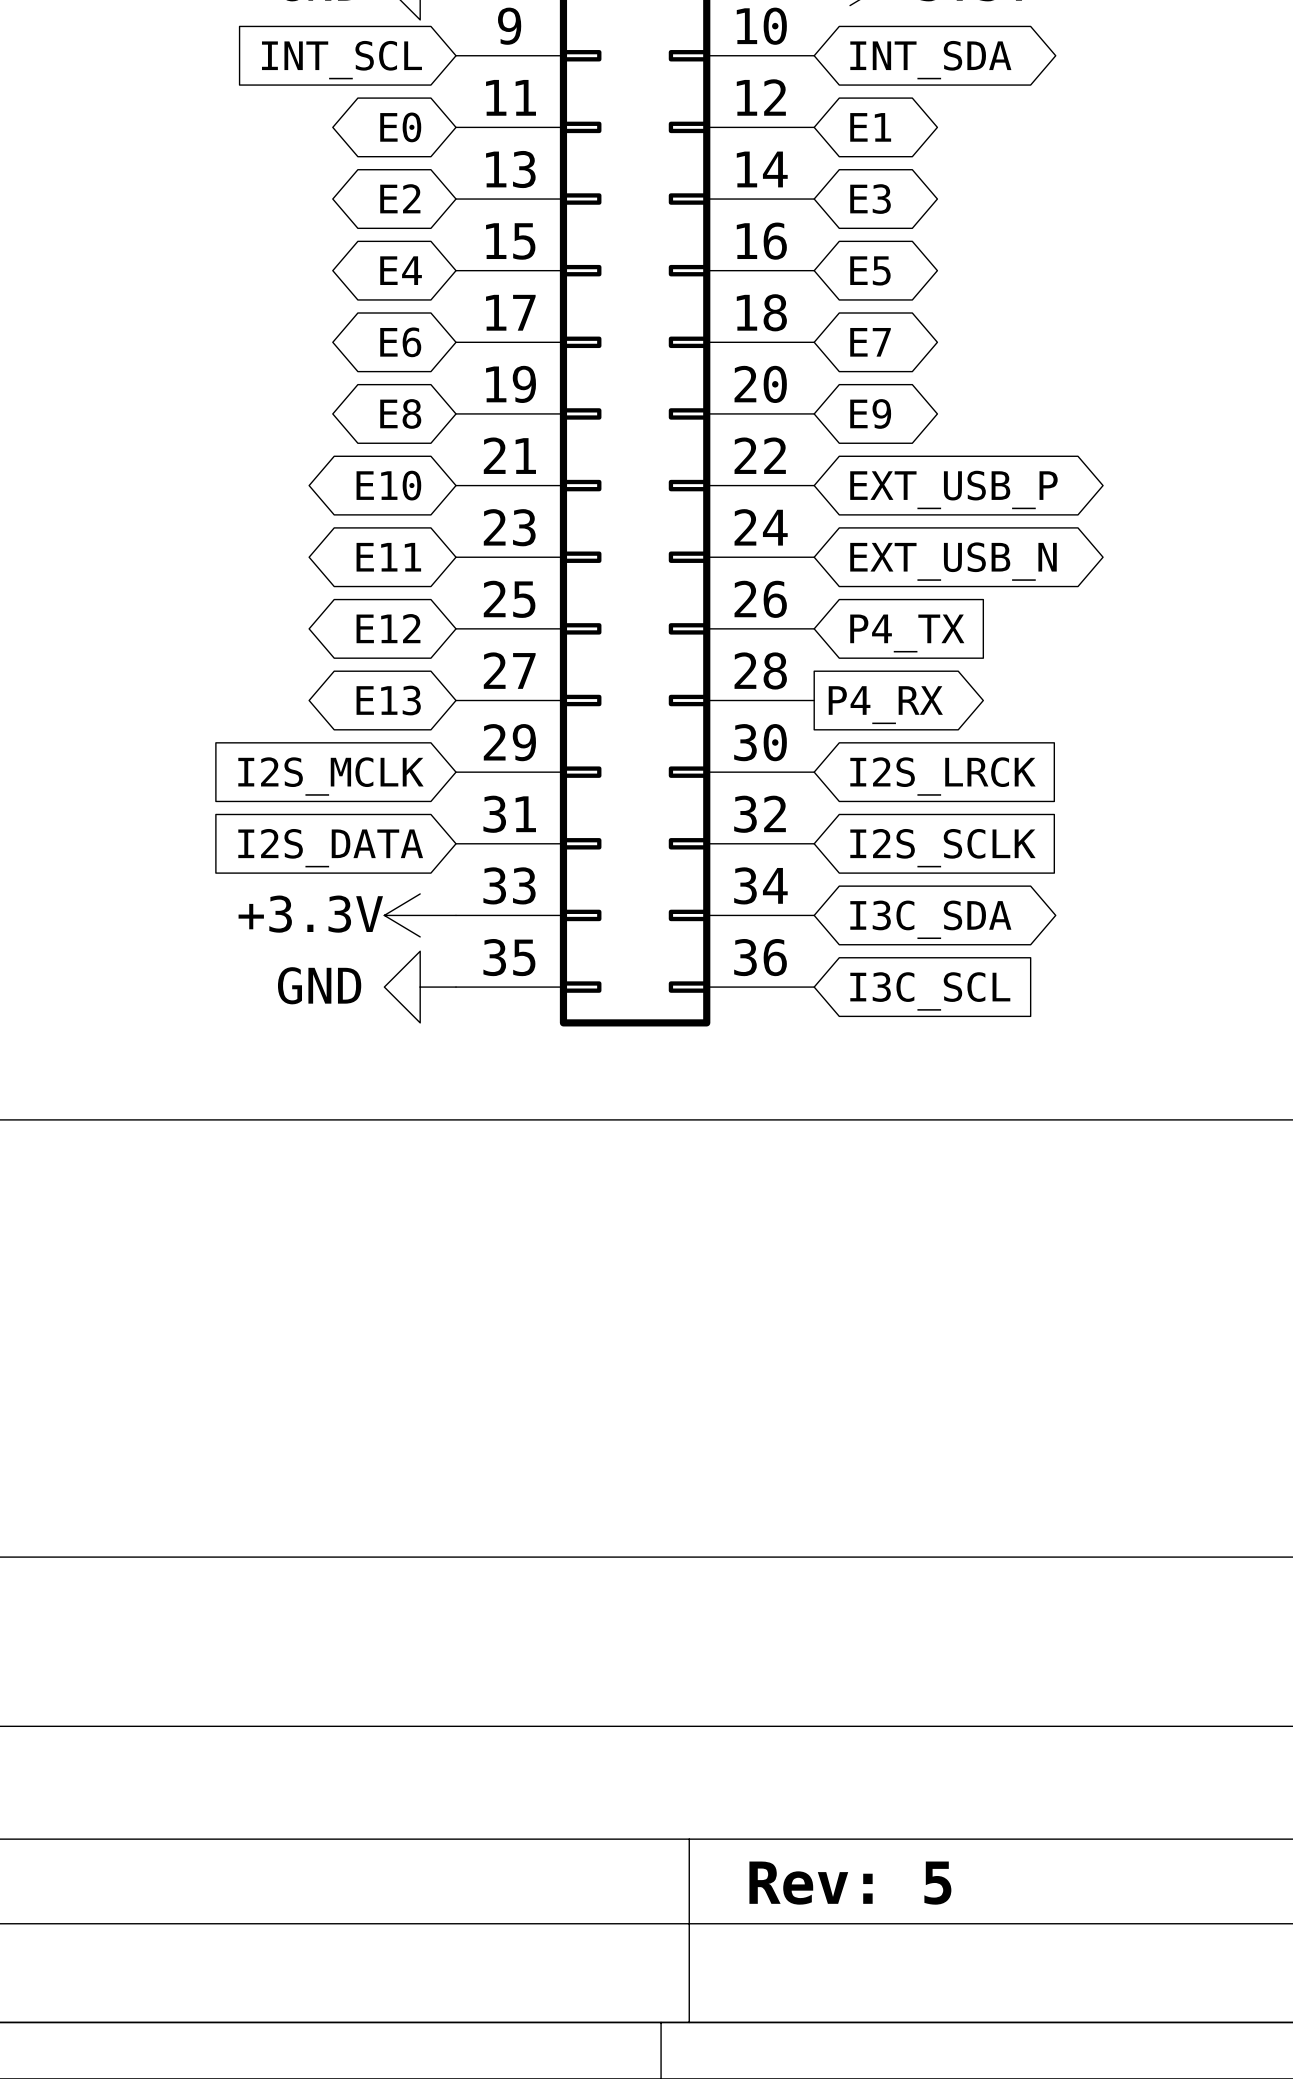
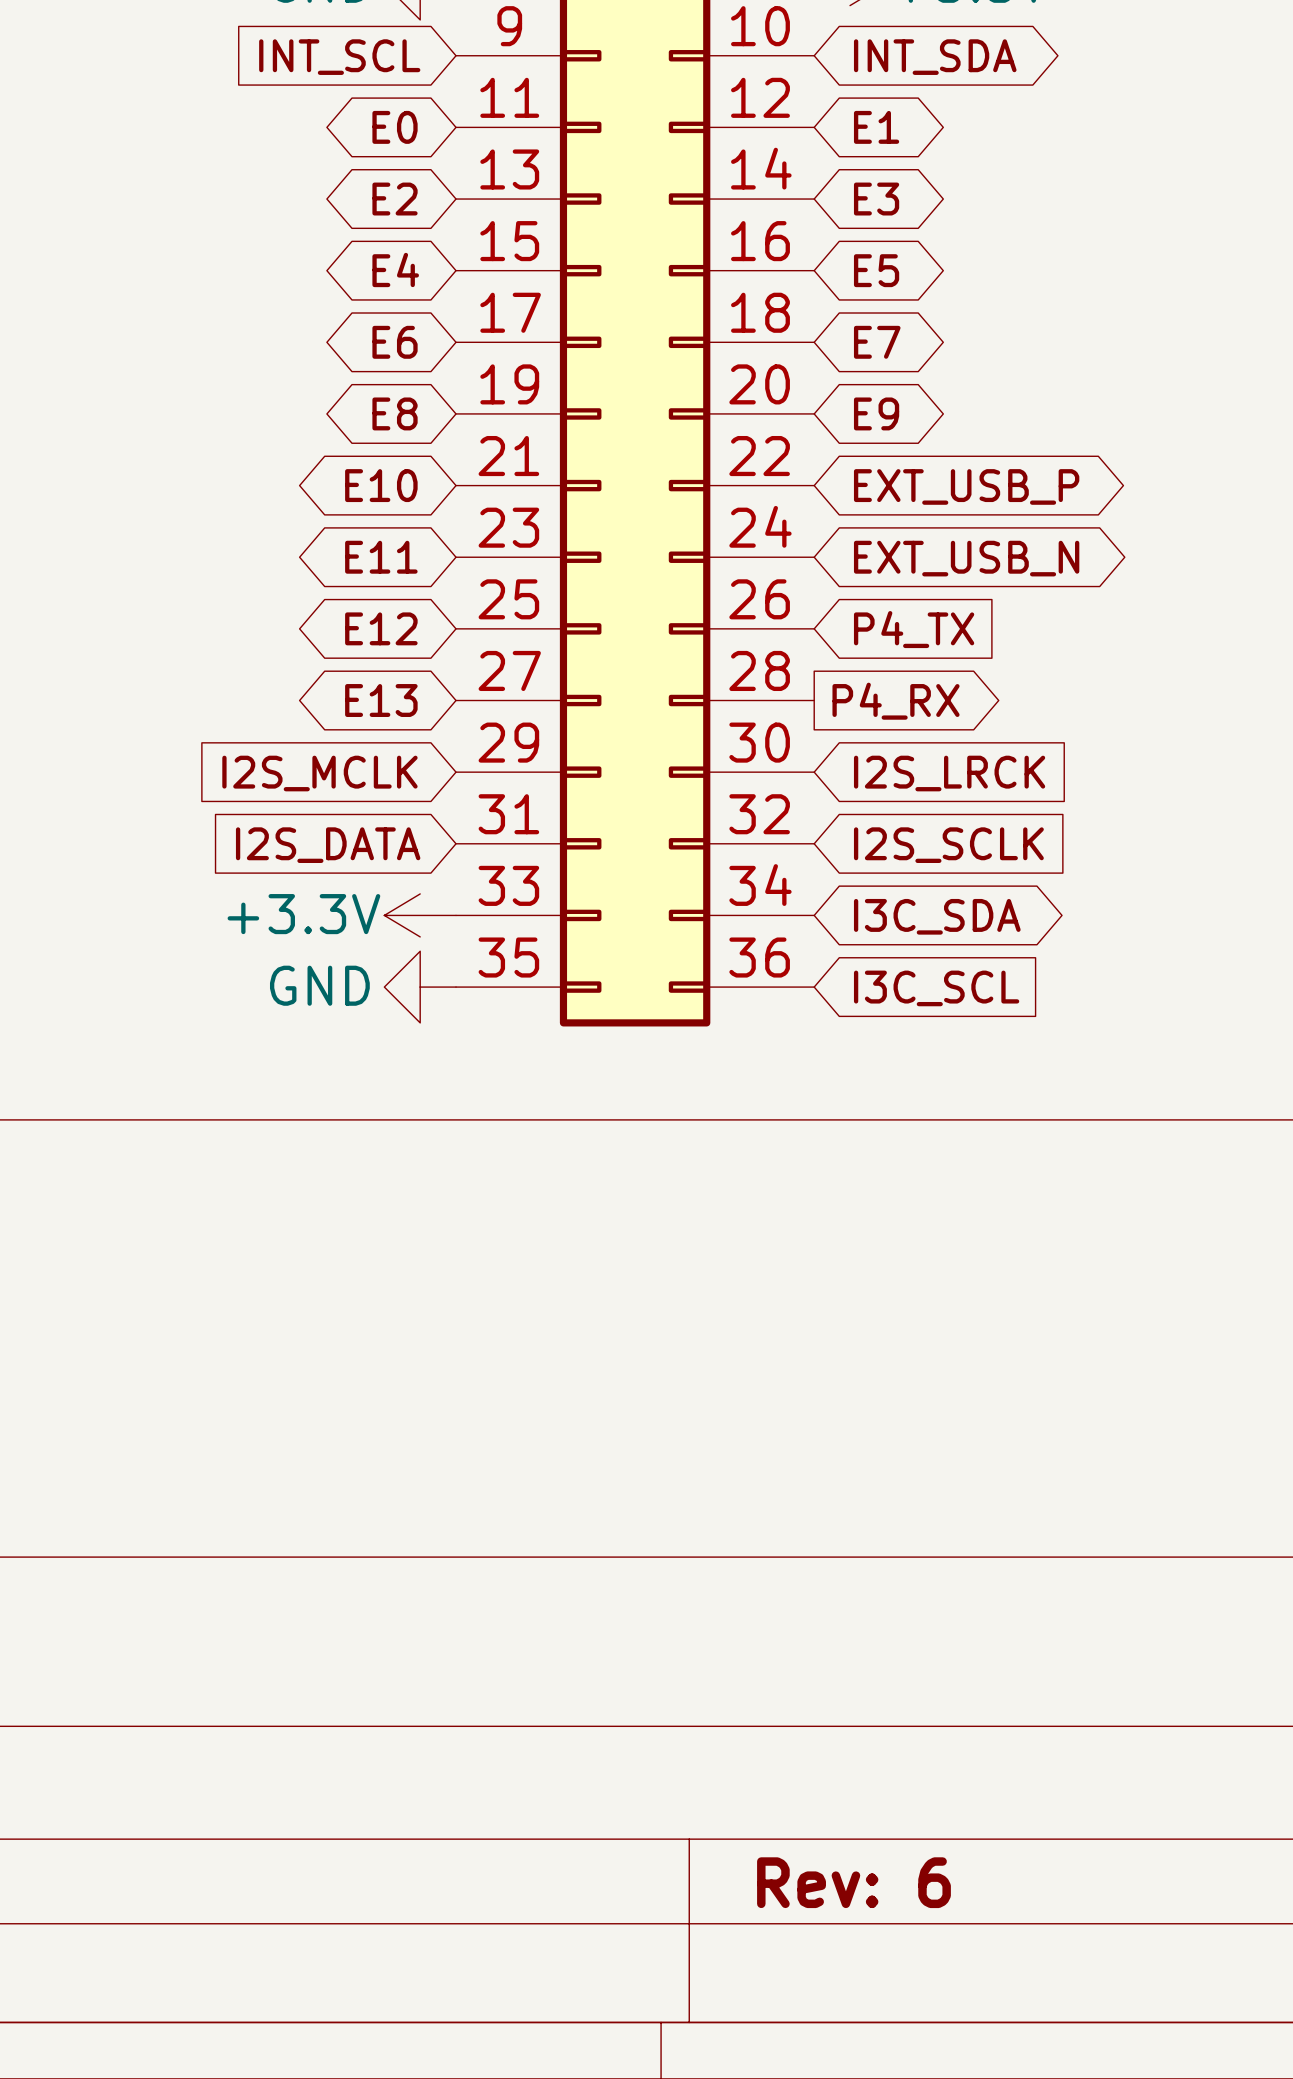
title block: Rev: 5 (850, 1883) -> Rev: 6 (853, 1882)

